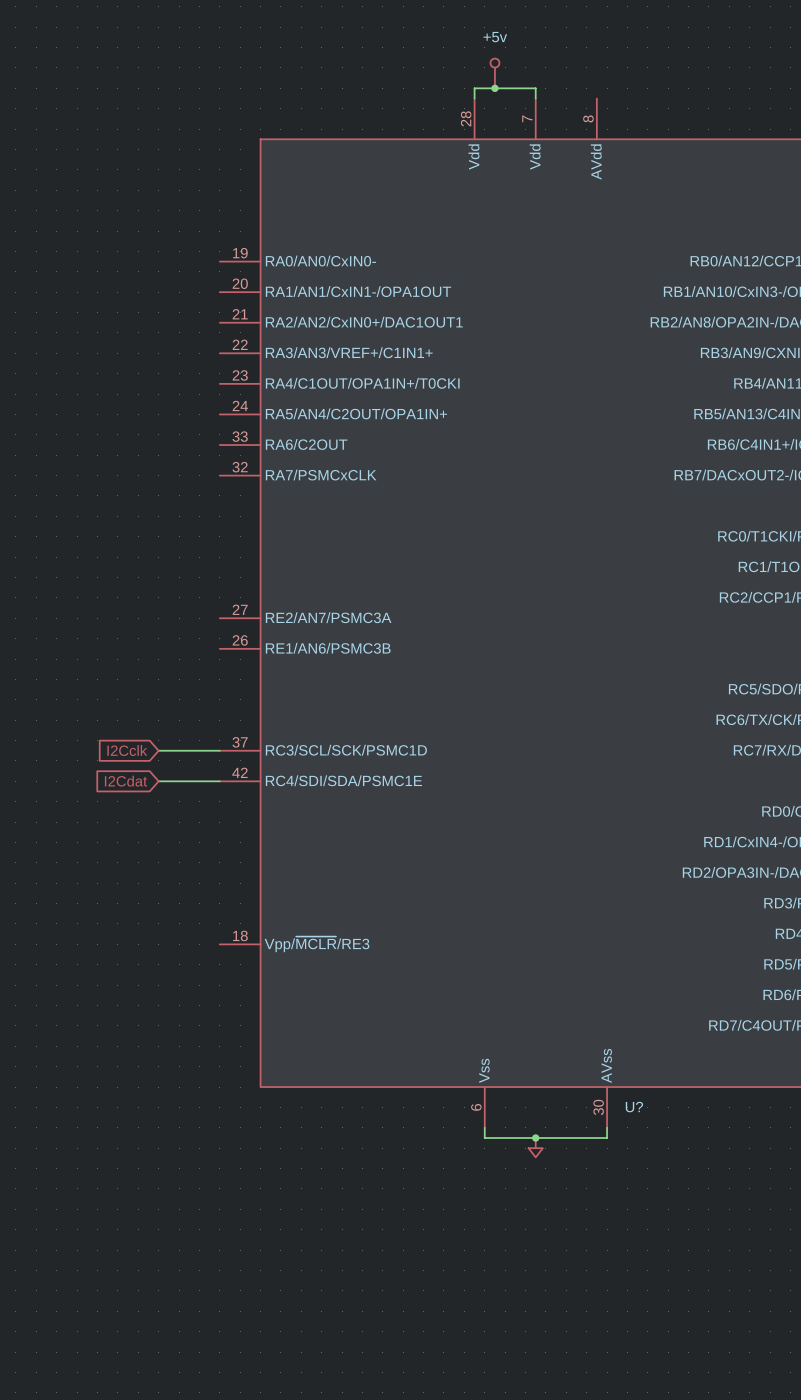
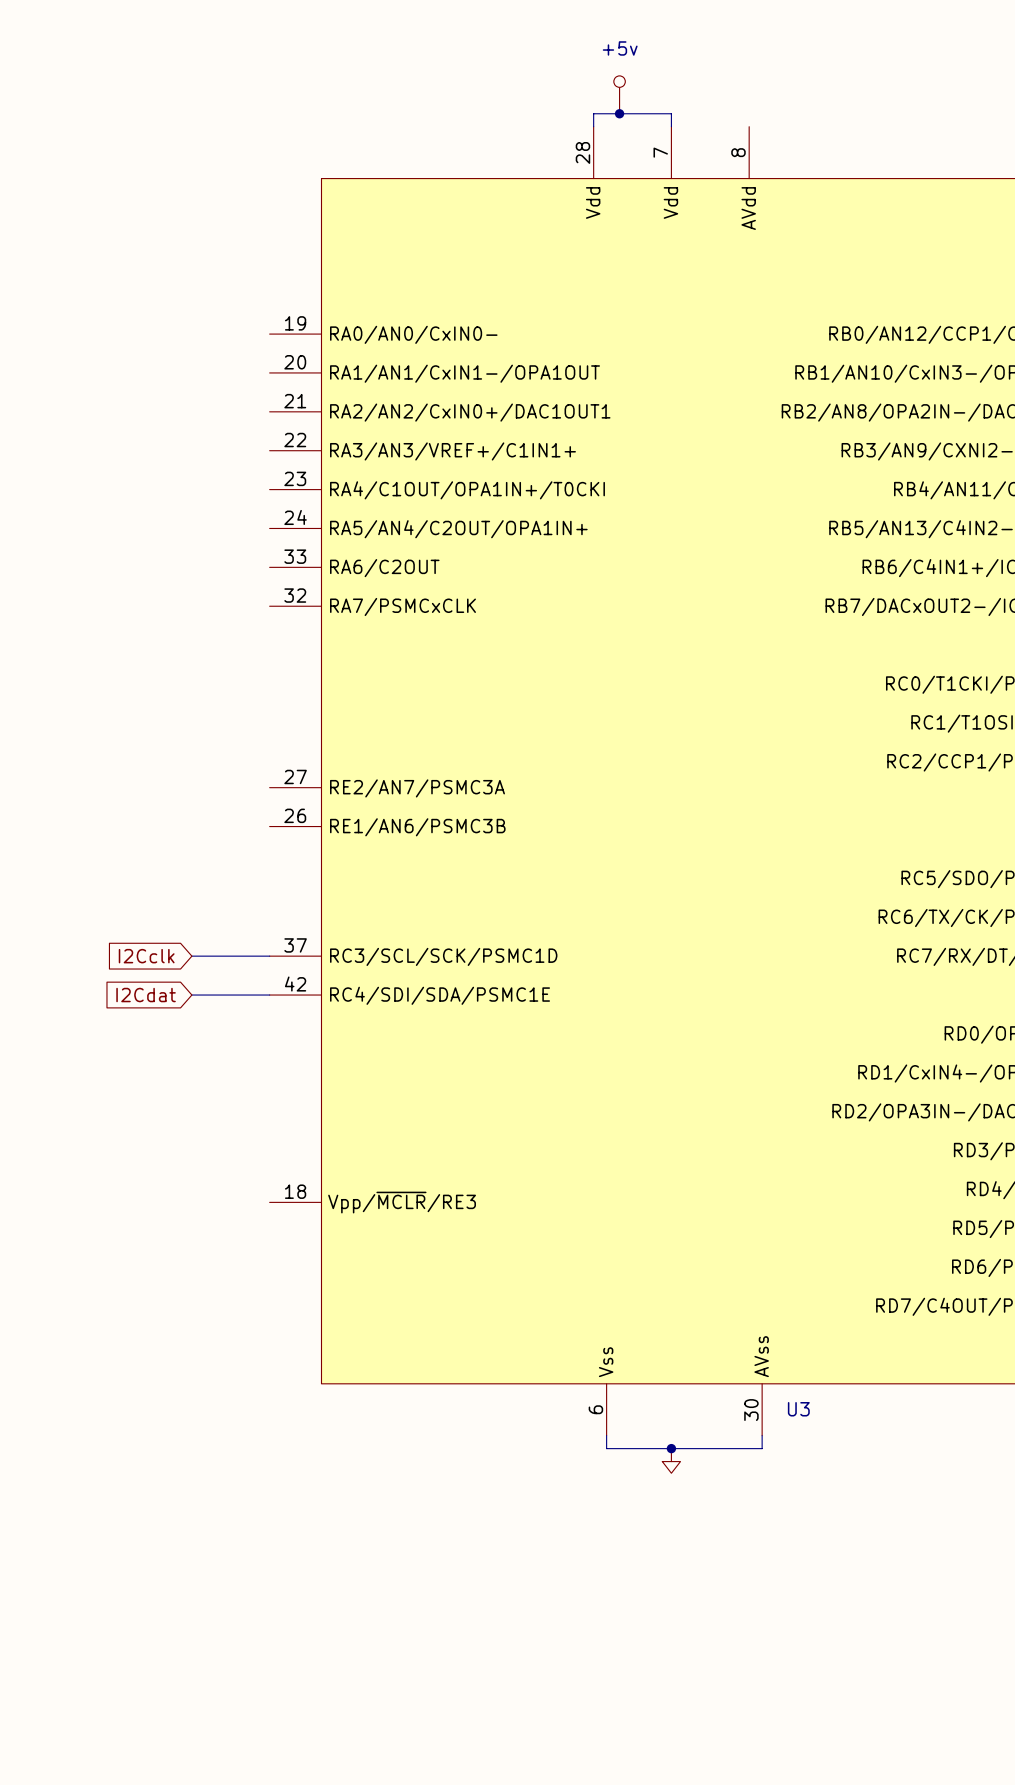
U? name: U? (634, 1107) -> U3 (798, 1409)

